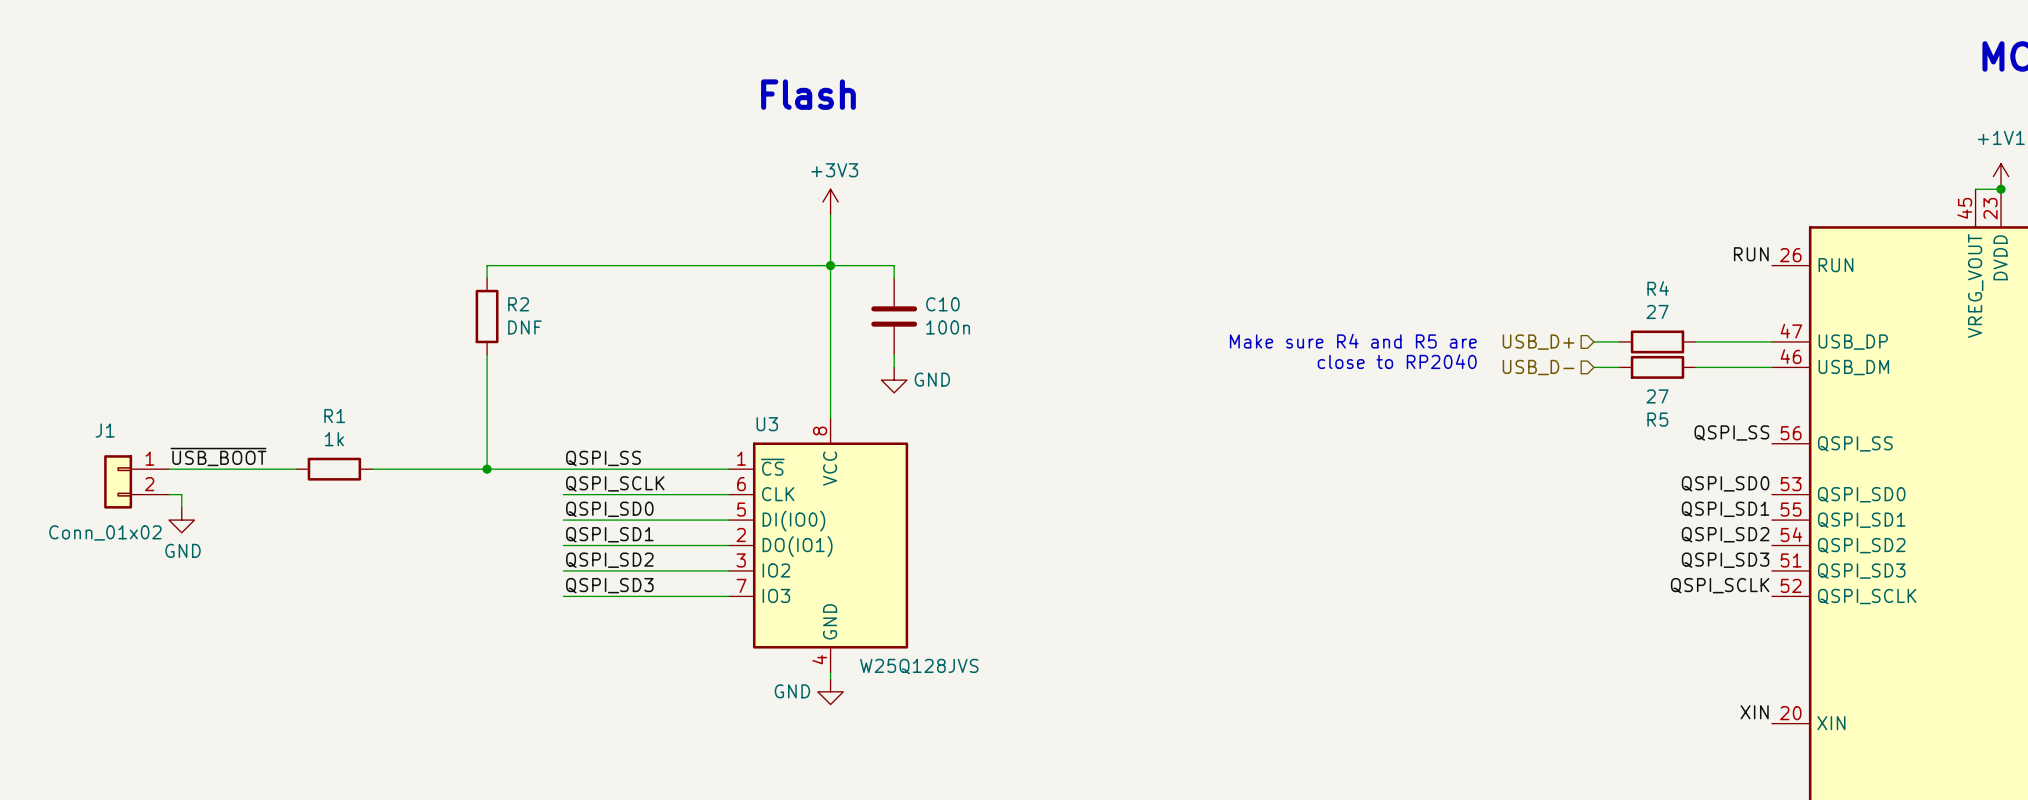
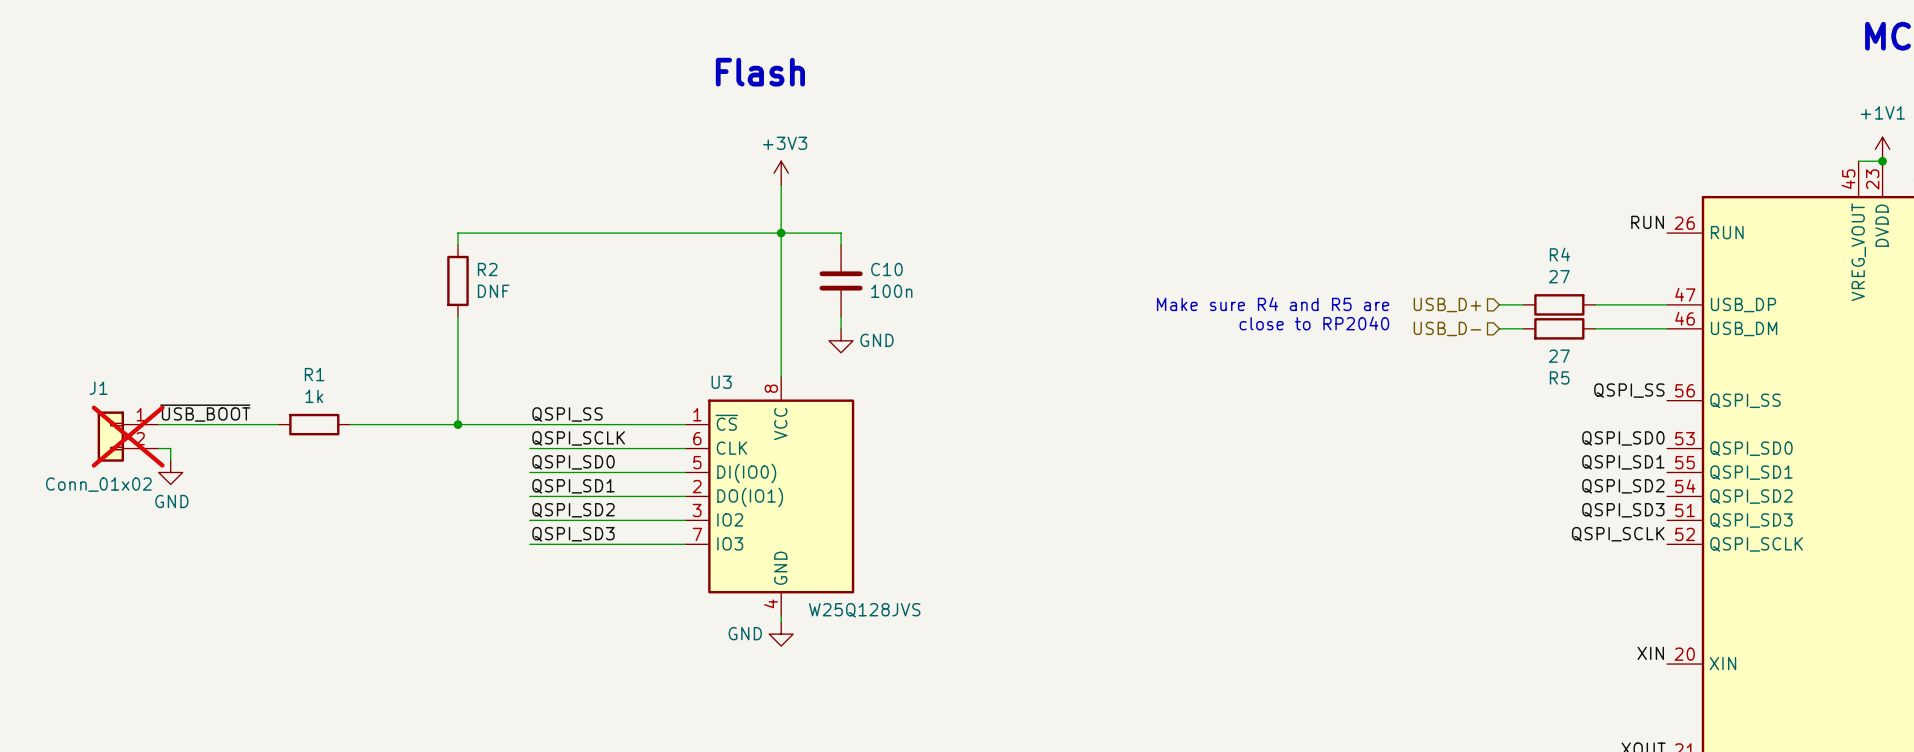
J1 do-not-place cross: none -> (128, 436)

